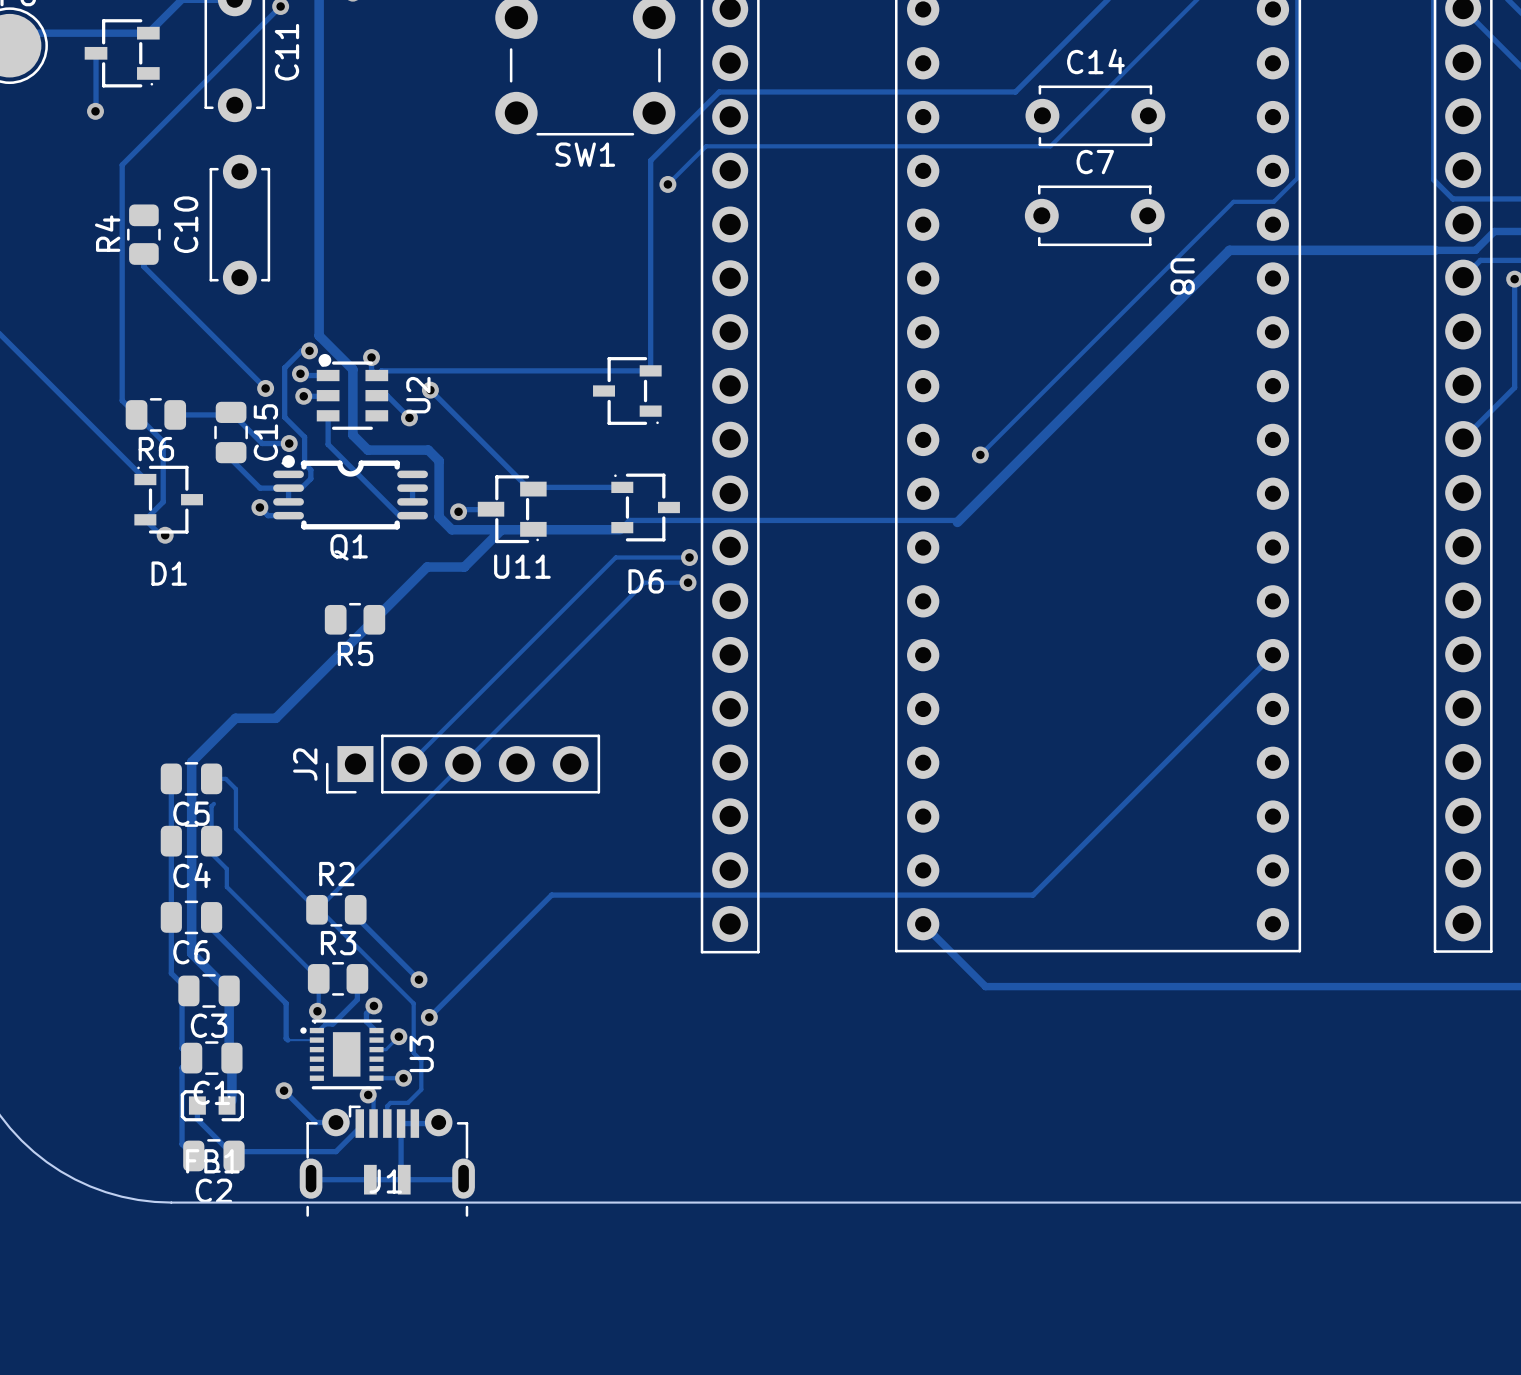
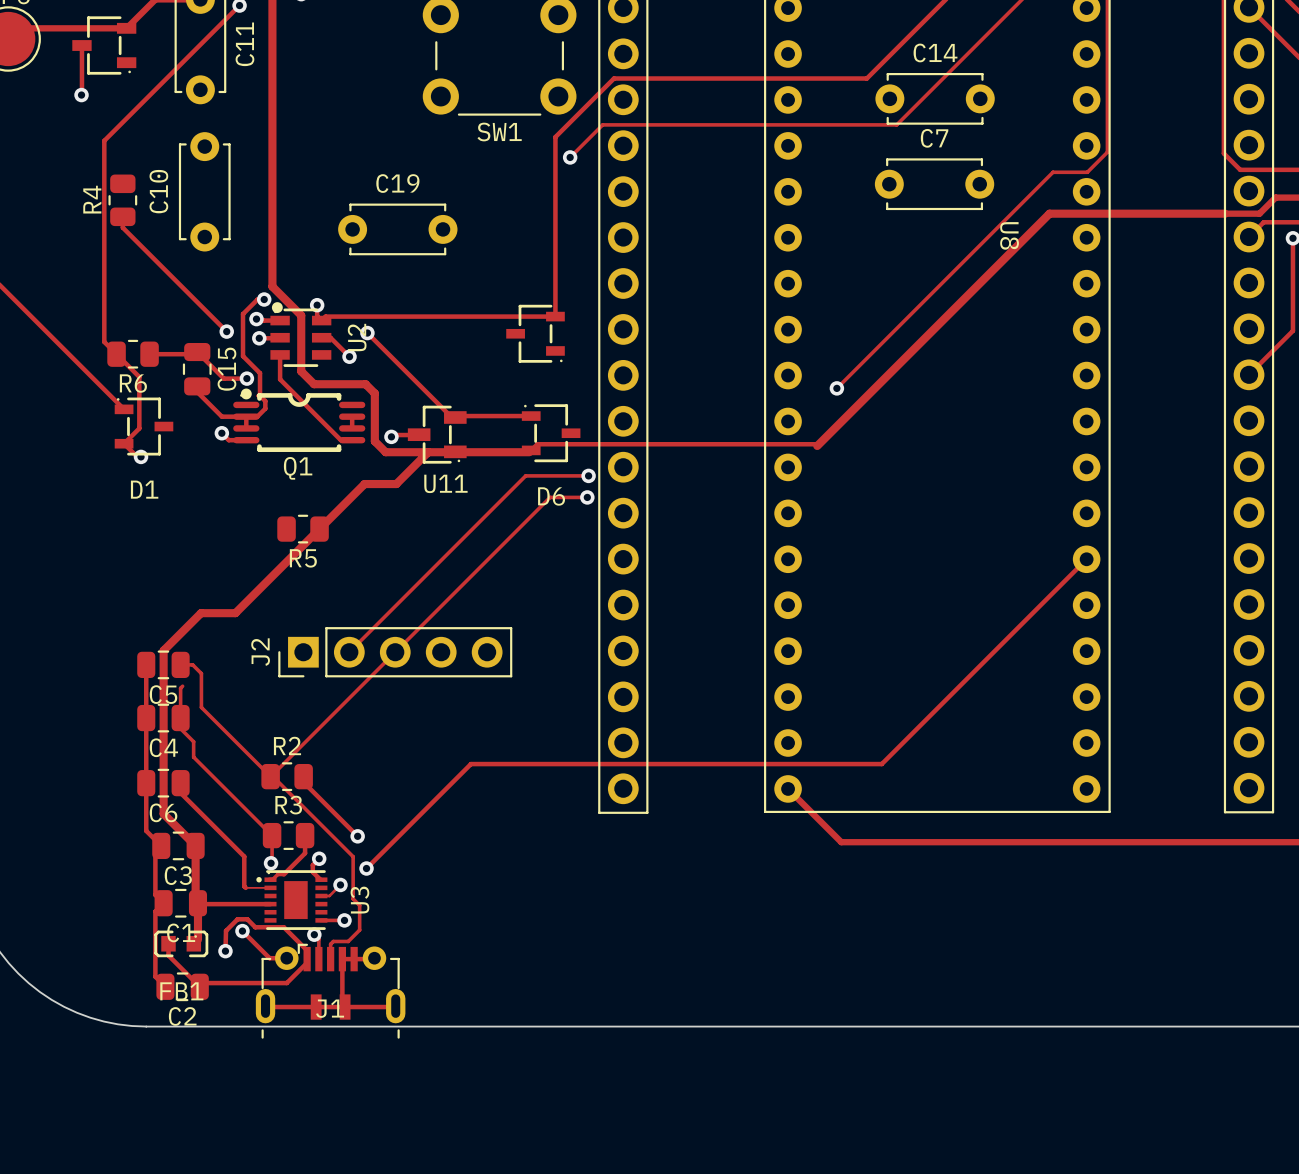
C19: none -> (397, 229)
track: none -> (198, 904) (270, 904)
track: none -> (226, 951) (226, 930) (237, 919) (247, 919) (255, 927) (283, 927) (307, 950) (307, 959)
via: none -> (225, 951)

